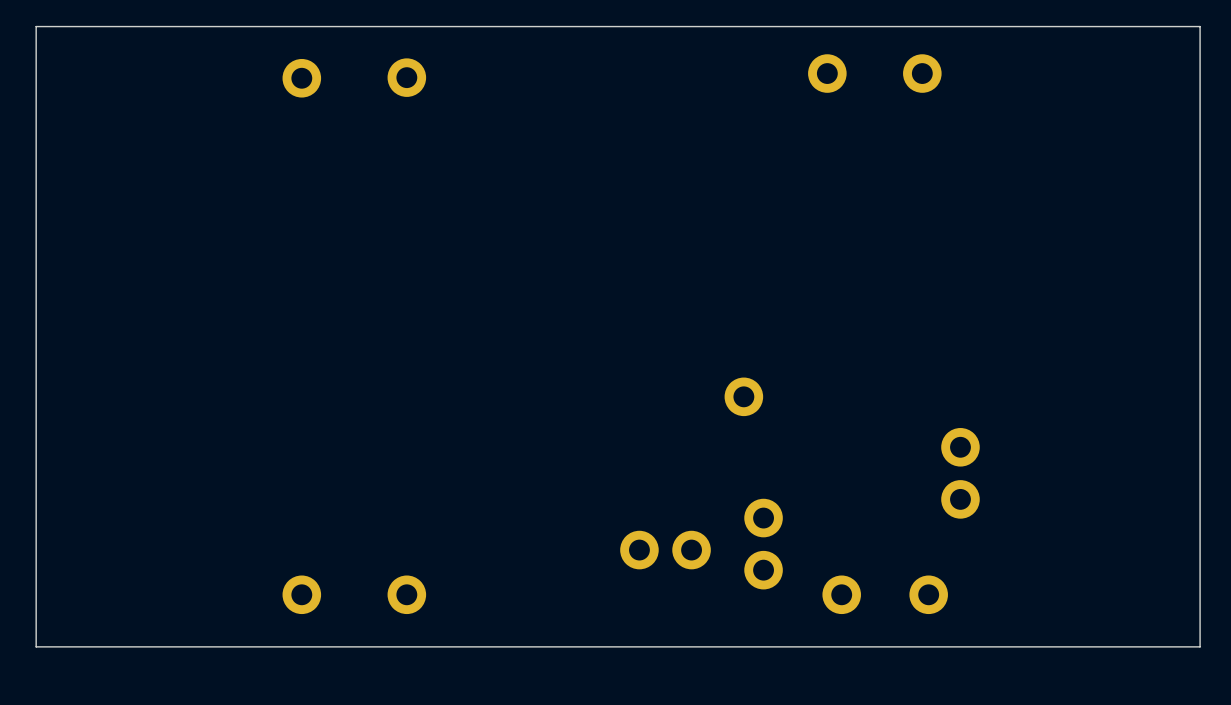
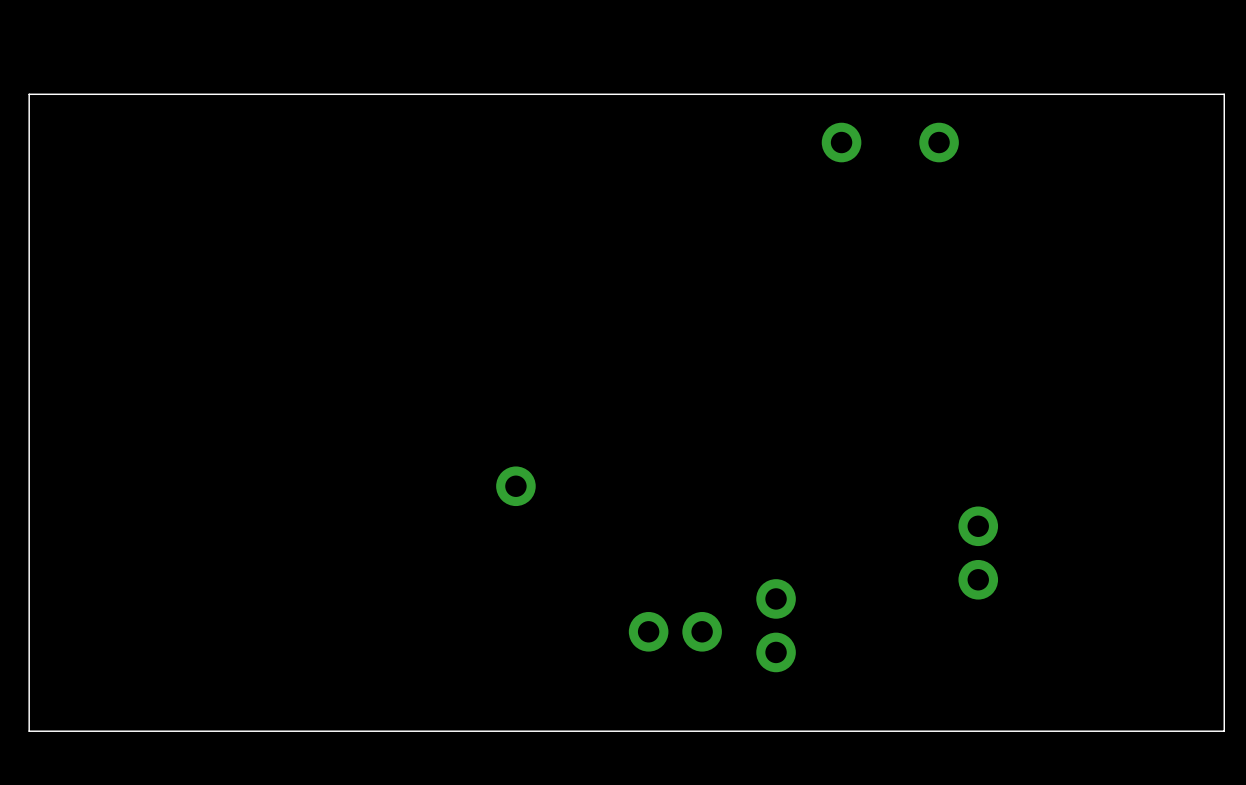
part: (406, 77) -> none
part: (301, 78) -> none
part: (743, 396) -> none
part: none -> (515, 486)
part: (301, 594) -> none
part: (406, 594) -> none
part: (841, 594) -> none
part: (928, 594) -> none

